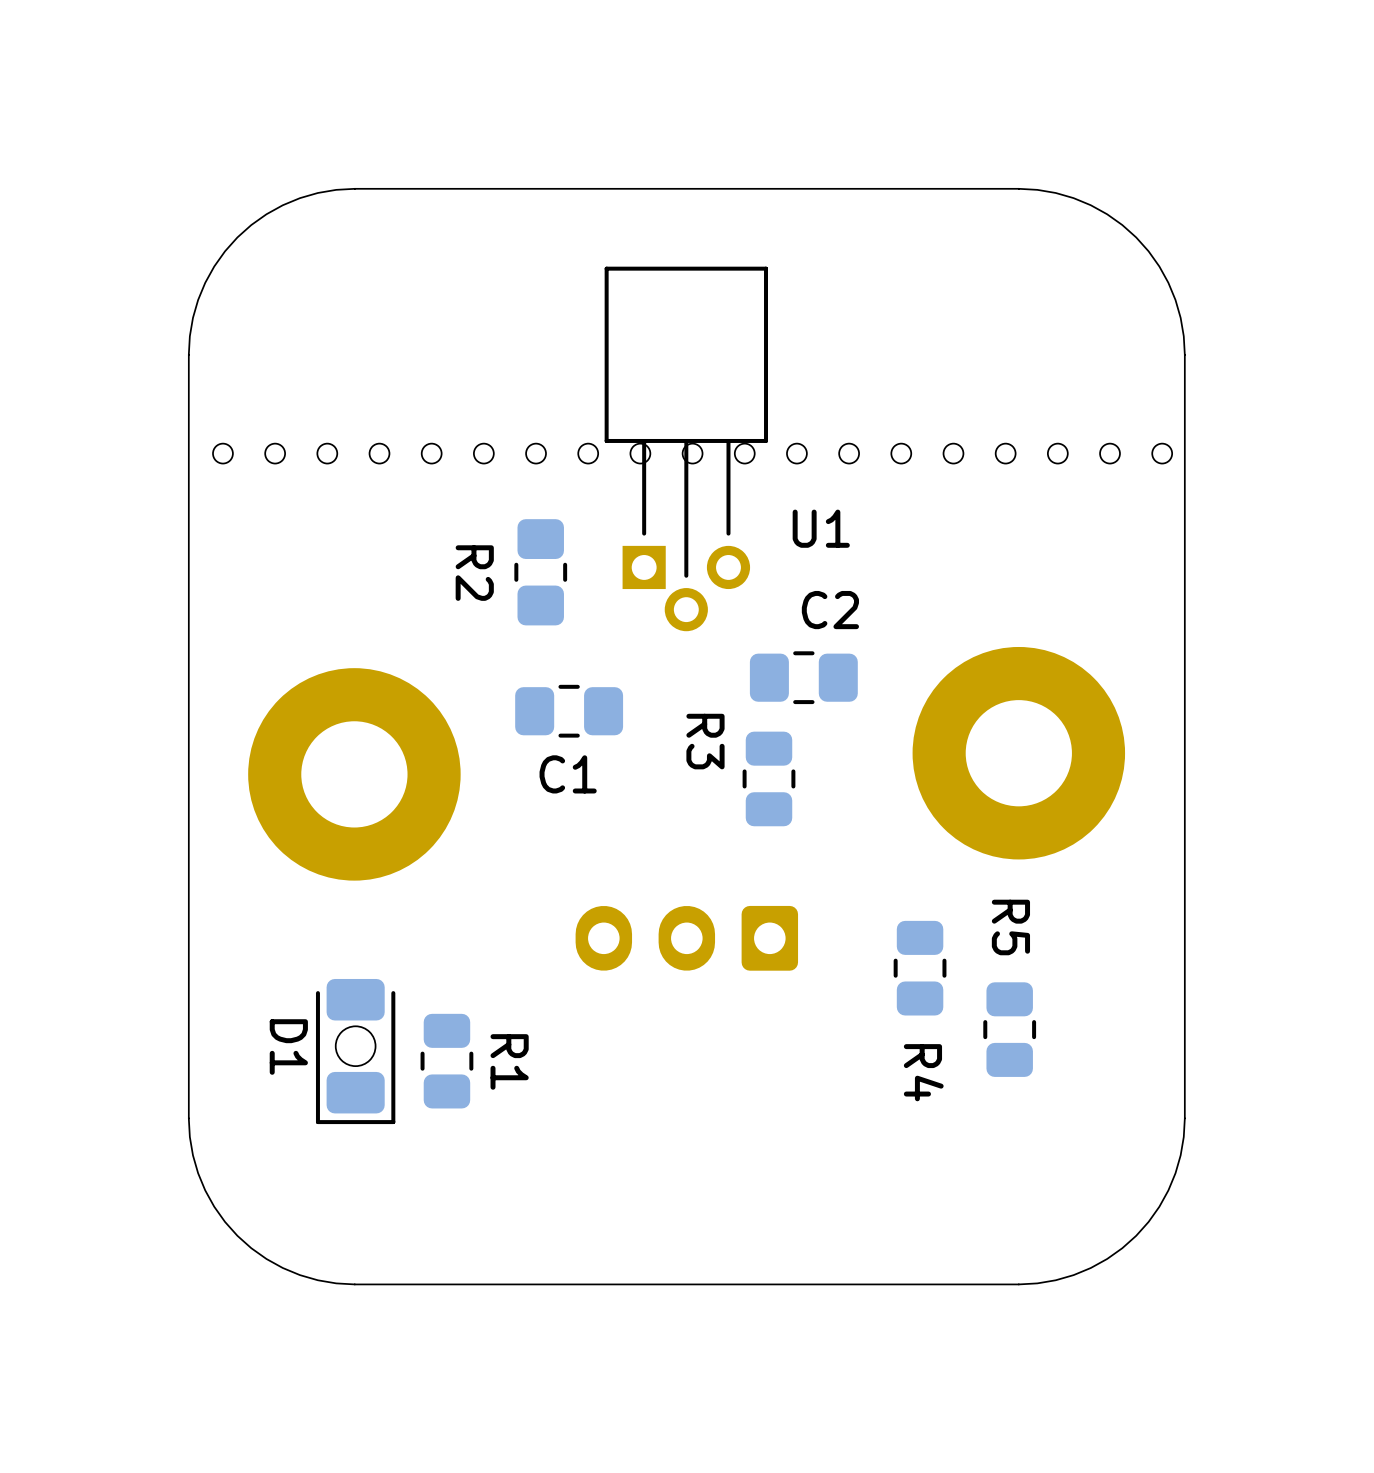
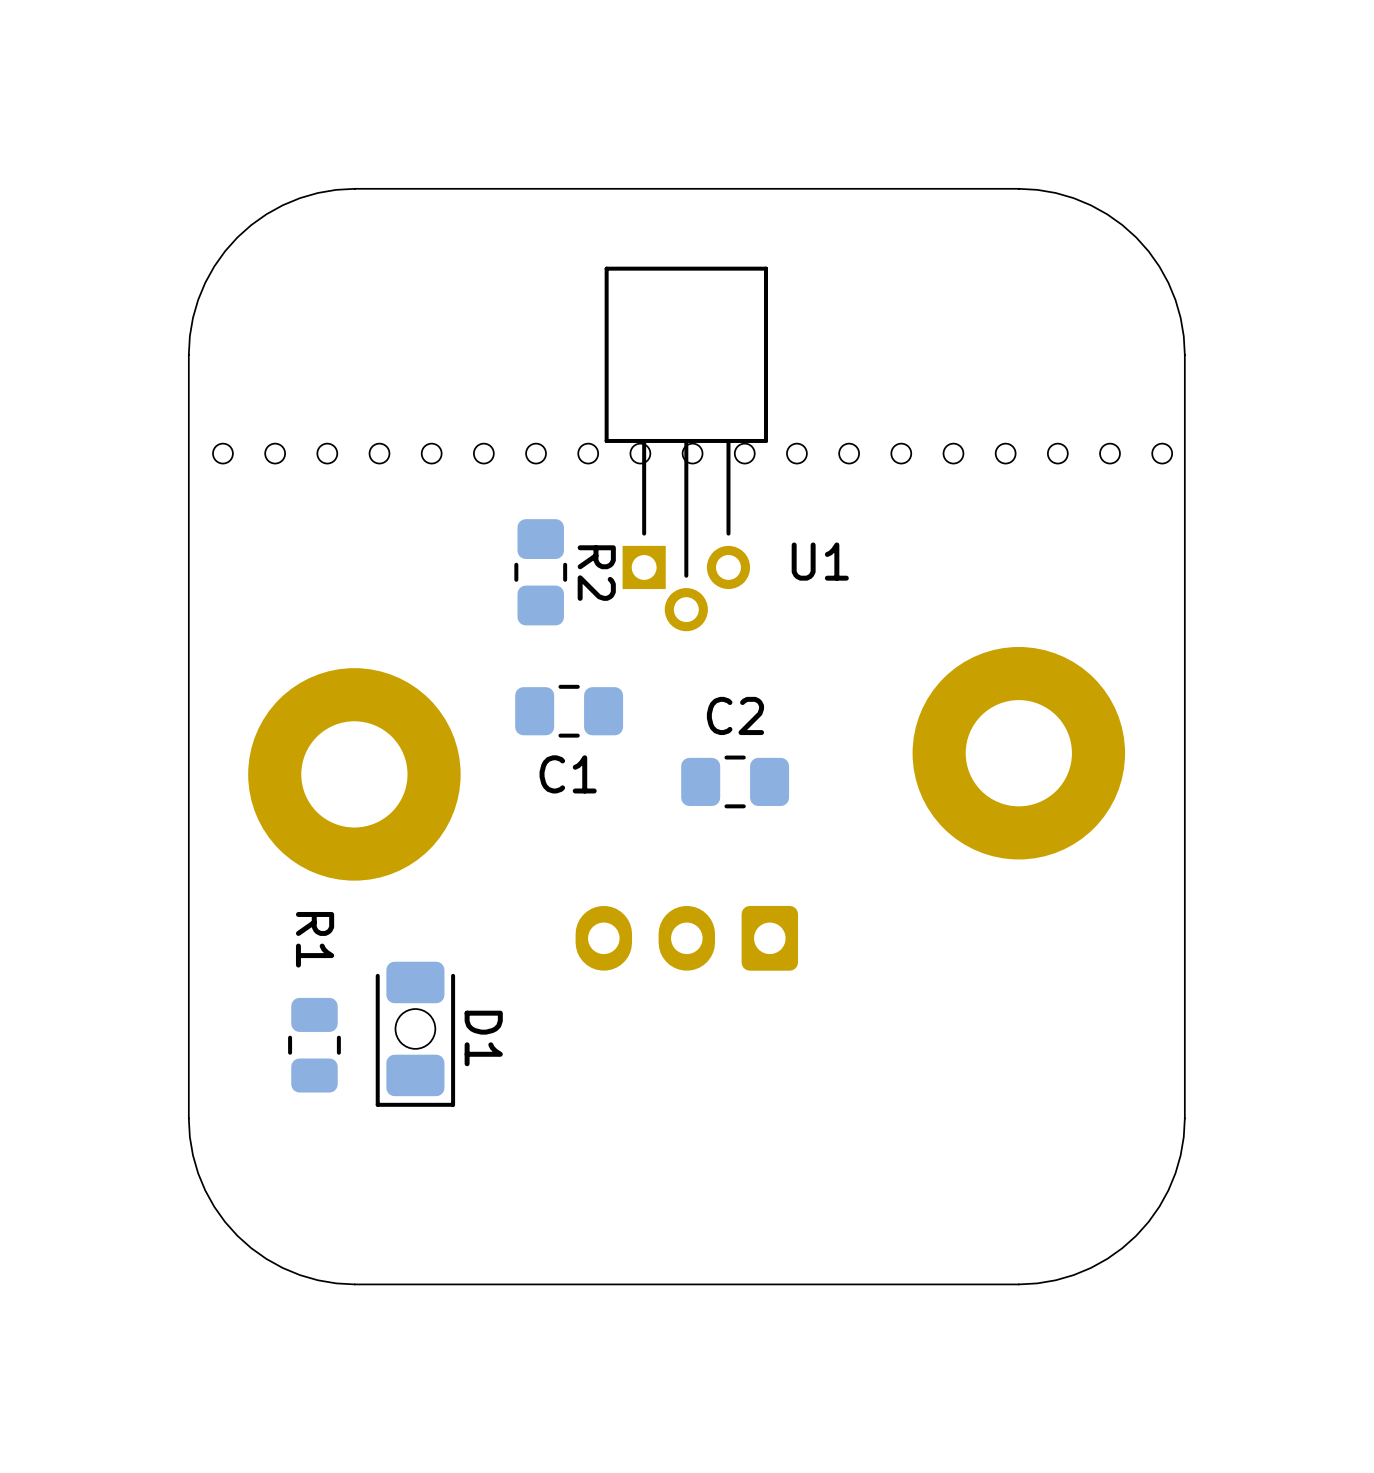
U1 name position: U1 (821, 528) -> U1 (820, 561)
R2 name position: R2 (474, 573) -> R2 (596, 573)
C2 name position: C2 (830, 610) -> C2 (735, 715)
C2 position: (803, 677) -> (735, 781)
R3: (768, 778) -> none
R4: (920, 968) -> none
R5: (1009, 1029) -> none
round board edge position: (355, 1046) -> (415, 1028)
D1 name position: D1 (288, 1047) -> D1 (483, 1038)
D1 position: (355, 1051) -> (415, 1034)
R1 position: (446, 1061) -> (314, 1045)
R1 name position: R1 (509, 1061) -> R1 (315, 939)

